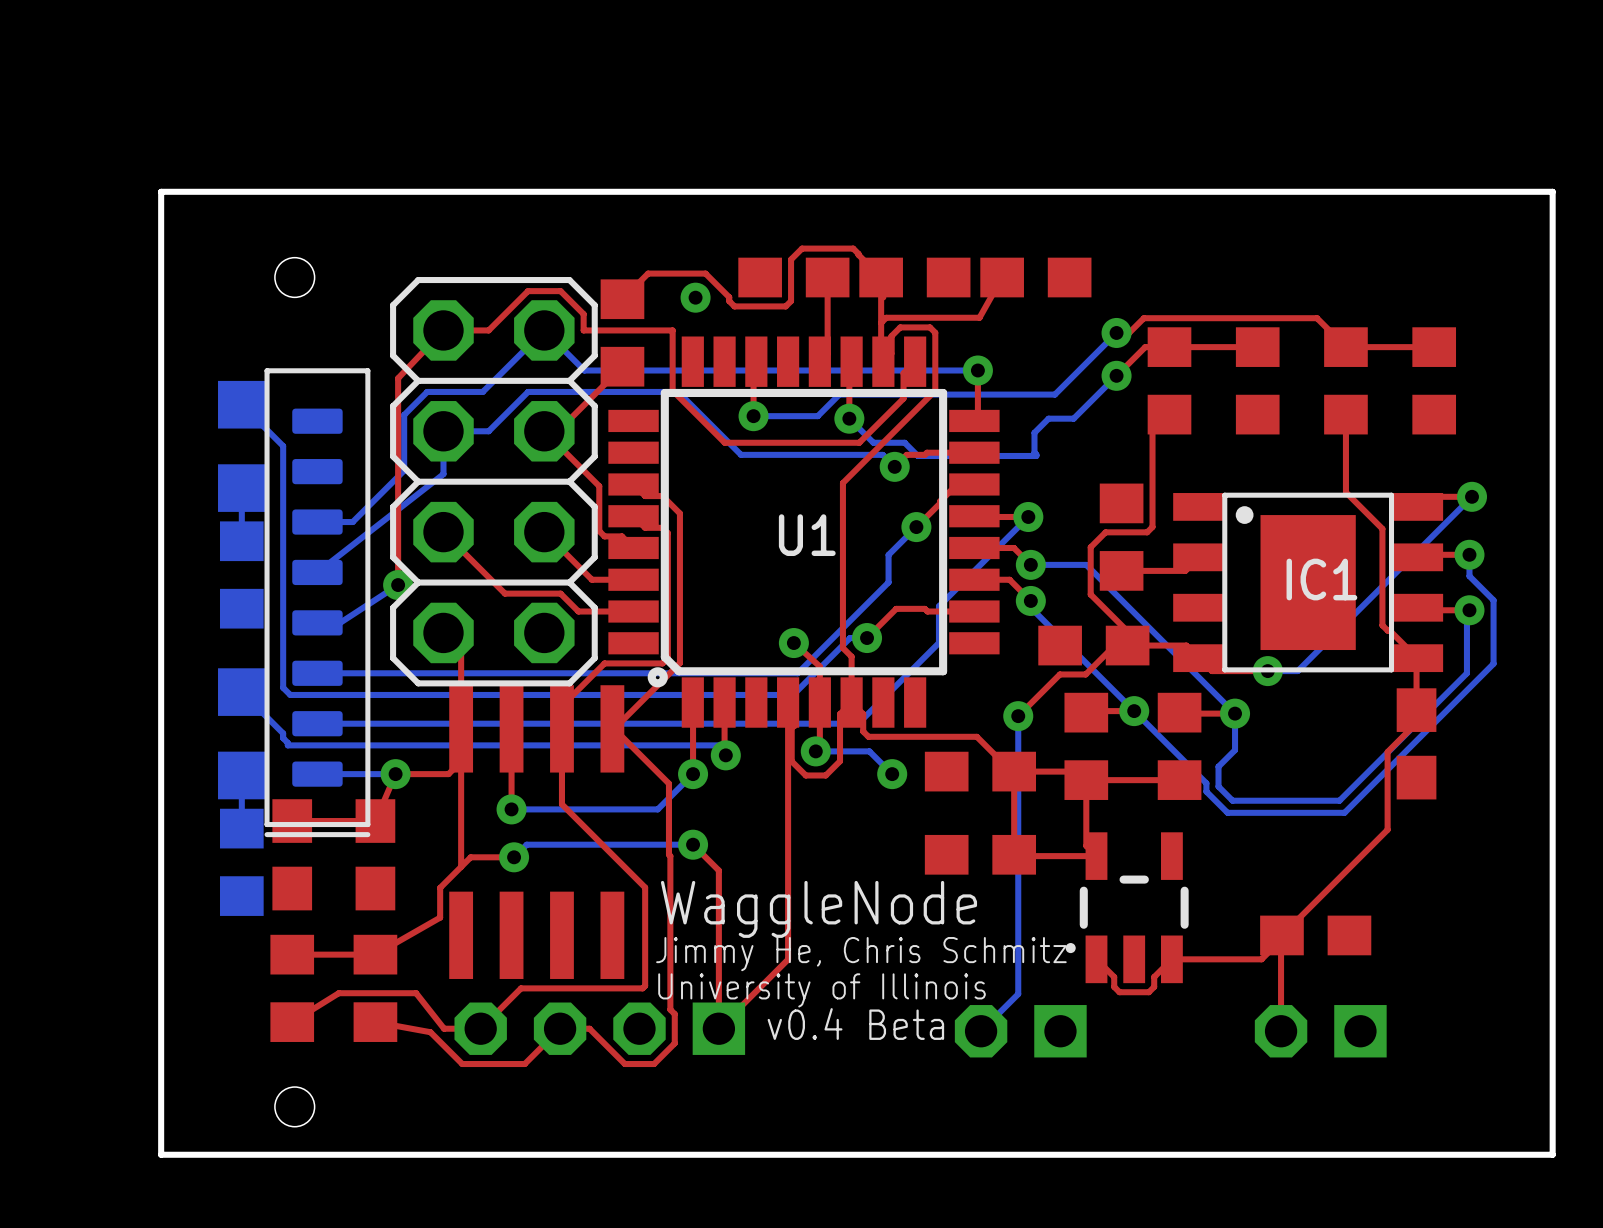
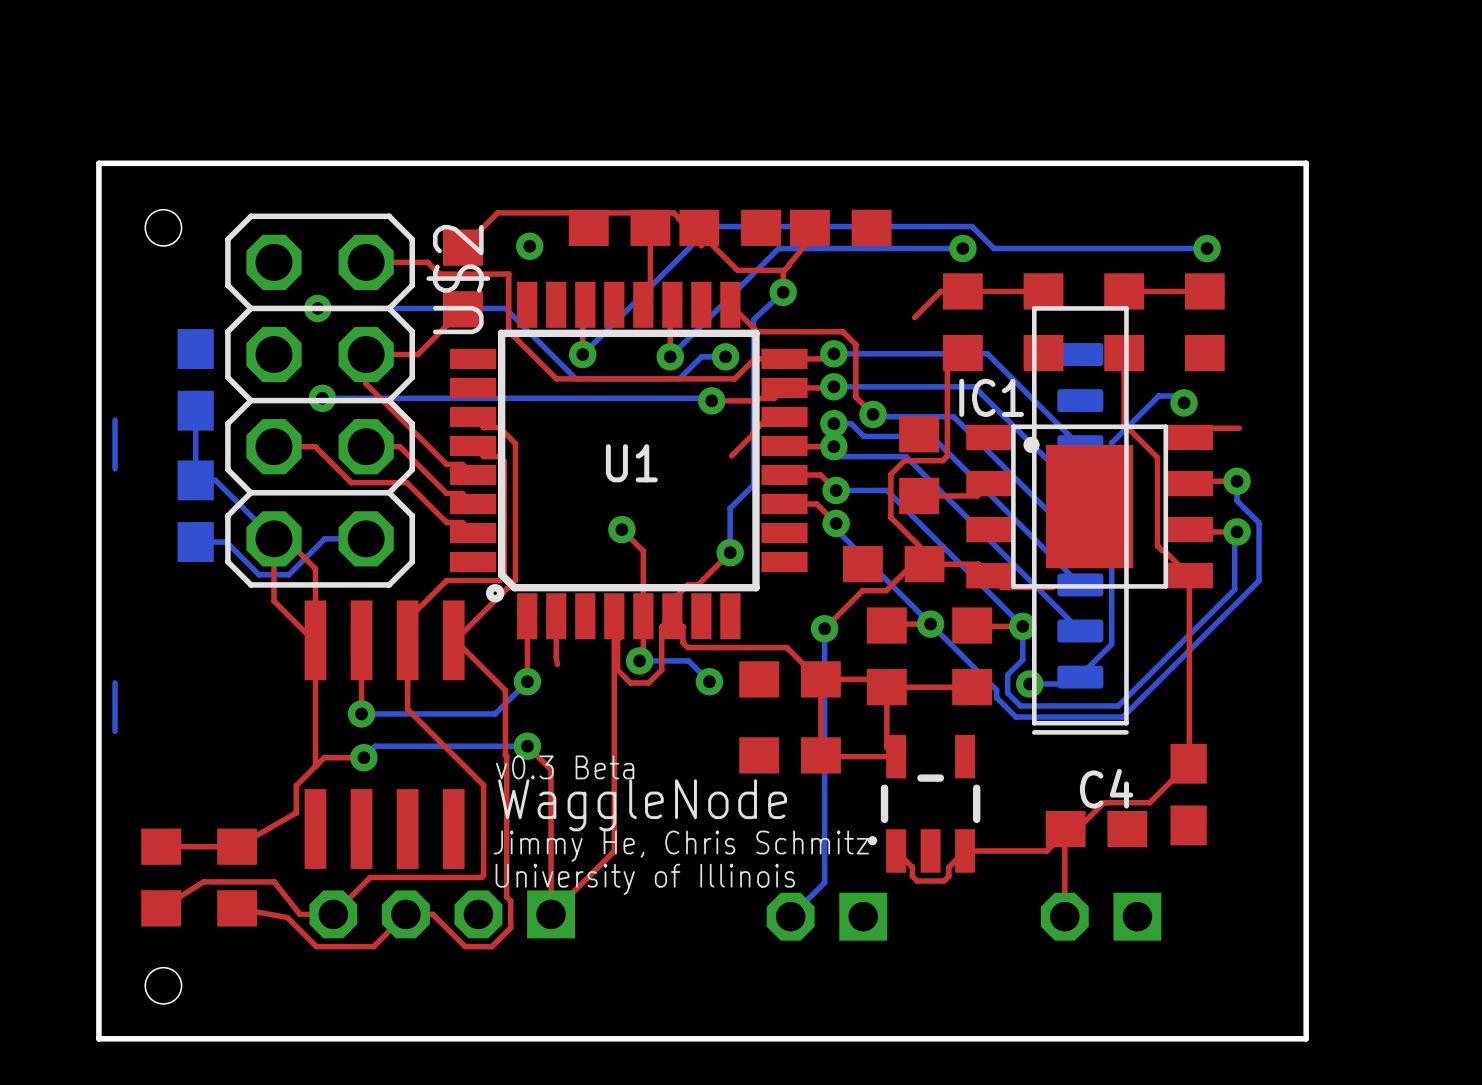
board edge: (161, 191) (161, 1154) (1552, 1154) (1552, 191) (161, 191) -> (98, 163) (98, 1038) (1306, 1038) (1306, 163) (98, 163)
top track: (648, 273) (705, 273) (729, 297) (729, 301) (734, 306) (785, 306) (791, 301) (791, 259) (802, 248) (853, 248) (881, 277) (881, 359) (883, 361) (891, 353) (891, 336) (900, 327) (929, 327) (935, 332) (935, 390) (842, 483) (842, 648) (851, 656) (851, 685) -> (486, 224) (497, 212) (673, 212) (699, 239) (711, 243) (737, 270) (784, 270)
top track: (1002, 277) (979, 317) (886, 317) (881, 322) -> none
top track: none -> (809, 239) (783, 271) (783, 292)
via: none -> (962, 248)
via: none -> (1207, 248)
top track: (672, 330) (583, 330) (583, 314) (560, 291) (528, 291) (488, 330) (443, 330) (398, 378) (398, 585) -> (508, 276) (508, 274) (439, 274) (427, 262) (366, 262)
top track: (1116, 332) (1129, 332) (1143, 318) (1317, 318) (1345, 347) -> none
bottom track: (1116, 332) (1054, 394) (839, 394) (817, 416) (753, 416) -> (1207, 248) (994, 248) (972, 226) (710, 226) (582, 354)
via: (1116, 332) -> none
U$2 name: none -> U$2 (458, 279)
bottom track: none -> (783, 292) (753, 319) (753, 484) (730, 508) (730, 552)
top track: (915, 361) (903, 373) (903, 398) (859, 442) -> (833, 353) (828, 358) (754, 358) (734, 378) (679, 378)
top track: none -> (730, 304) (757, 331) (842, 331) (855, 344) (855, 397) (873, 414)
bottom track: none -> (317, 308) (505, 308) (575, 378) (679, 378) (701, 356) (725, 356)
via: none -> (317, 308)
part footprint: [264, 368, 371, 838] -> [177, 460, 214, 563]
top track: (977, 370) (977, 417) (974, 420) -> none
bottom track: (977, 370) (584, 370) (544, 330) (482, 391) (427, 391) (404, 414) (404, 470) (352, 522) (317, 522) -> none
via position: (977, 370) -> (783, 292)
bottom track: (1116, 375) (1073, 418) (1048, 418) (1034, 432) (1034, 452) (1036, 455) (917, 455) (904, 442) (873, 442) (849, 418) -> (962, 248) (778, 248) (670, 356)
via: (1116, 375) -> none
bottom track: (241, 404) (283, 446) (283, 687) (290, 694) (793, 694) (850, 638) (867, 638) -> none
bottom track: none -> (833, 353) (987, 353) (1080, 446)
via: none -> (833, 353)
top track: (573, 416) (557, 431) (544, 431) (599, 486) (599, 531) -> (417, 354) (366, 354) (366, 384) (441, 459)
via: none -> (725, 356)
part: (241, 446) -> none
top track: none -> (833, 386) (784, 387) (773, 398) (723, 400)
bottom track: none -> (833, 386) (974, 386) (1080, 492)
via: none -> (833, 386)
top track: (974, 452) (926, 452) (924, 454) (906, 454) (894, 466) -> none
bottom track: none -> (322, 398) (720, 398) (723, 400)
via: none -> (322, 398)
bottom track: (894, 466) (882, 454) (741, 454) (678, 391) (528, 391) (488, 431) (443, 431) (443, 474) (317, 572) -> none
bottom track: none -> (1184, 402) (1177, 396) (1158, 396) (1111, 443) (1111, 644) (1073, 684) (1029, 684)
bottom track: none -> (195, 410) (195, 480) (215, 480) (274, 538)
U$2 position: (493, 481) -> (320, 400)
bottom track: none -> (873, 414) (875, 416) (953, 416) (1075, 538) (1080, 538)
via: none -> (873, 414)
bottom track: none -> (833, 423) (851, 423) (863, 436) (931, 436) (1080, 584)
via: none -> (833, 423)
bottom track: (1472, 496) (1297, 671) (1267, 671) -> none
via position: (1472, 496) -> (1184, 402)
bottom track: (1028, 516) (938, 606) (938, 642) (858, 723) (317, 723) -> none
bottom track: (916, 527) (888, 554) (888, 582) (797, 673) (317, 673) -> none
via: (916, 527) -> none
bottom track: none -> (836, 456) (906, 456) (1080, 631)
top track: (443, 532) (505, 593) (560, 593) (578, 611) (633, 611) -> (274, 446) (315, 446) (351, 482) (406, 482) (446, 522) (462, 522) (473, 533)
top track: (544, 532) (591, 579) (633, 579) -> (366, 446) (399, 446) (446, 493) (462, 493) (473, 504)
part: (241, 574) -> none
IC1 name position: IC1 (1321, 579) -> IC1 (991, 397)
bottom track: (398, 585) (340, 622) (317, 622) -> none
via: (398, 585) -> none
part: none -> (1080, 520)
top track: (974, 611) (927, 611) (924, 608) (896, 608) (867, 638) -> none
top track: none -> (274, 538) (274, 601) (315, 642)
bottom track: none -> (366, 538) (324, 538) (288, 574) (259, 574) (226, 542) (195, 542)
top track: none -> (730, 552) (697, 584) (687, 584) (672, 600)
via: none -> (730, 552)
via: (867, 638) -> none
top track: (793, 643) (819, 666) -> (621, 529) (643, 551) (643, 583)
via position: (793, 643) -> (621, 529)
top track: (1417, 658) (1416, 723) (1387, 752) (1387, 829) (1281, 935) -> (1189, 575) (1189, 763) (1149, 802) (1103, 802) (1077, 829)
via position: (1267, 671) -> (1029, 684)
bottom track: (241, 692) (283, 733) (283, 738) (287, 745) (723, 745) (725, 755) -> none
part: (241, 733) -> none
part position: (1416, 743) -> (1188, 794)
via: (725, 755) -> none
top track: (461, 761) (448, 774) (395, 774) (375, 821) (292, 821) -> none
bottom track: (317, 774) (395, 774) -> none
via: (395, 774) -> none
part side: top (292, 854) -> bottom (195, 379)
part: (375, 854) -> none
part: (241, 862) -> none
text: none -> v0.3 Beta (565, 767)
C4 name: none -> C4 (1106, 788)
text: v0.4 Beta (855, 1024) -> none

